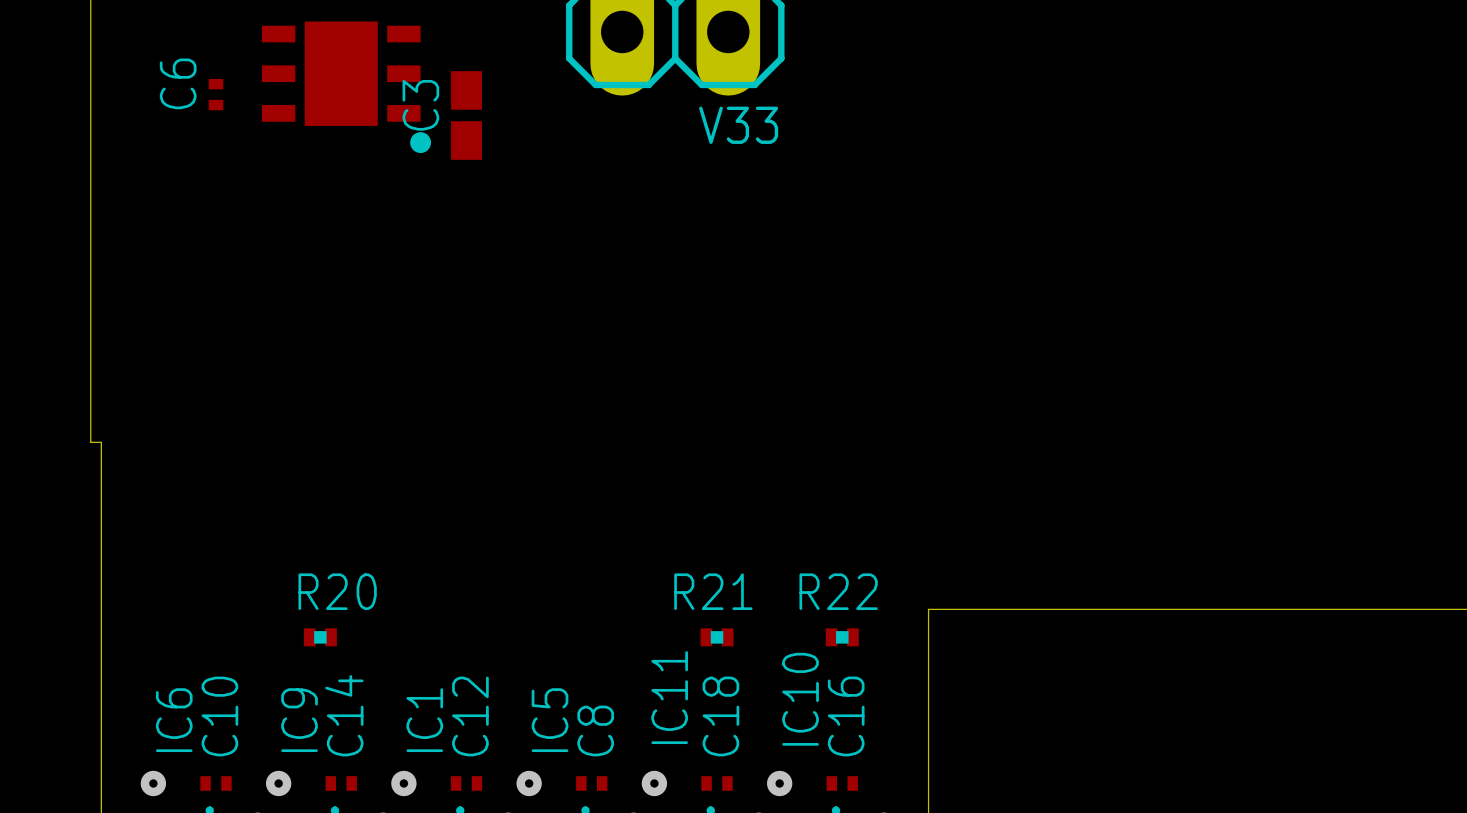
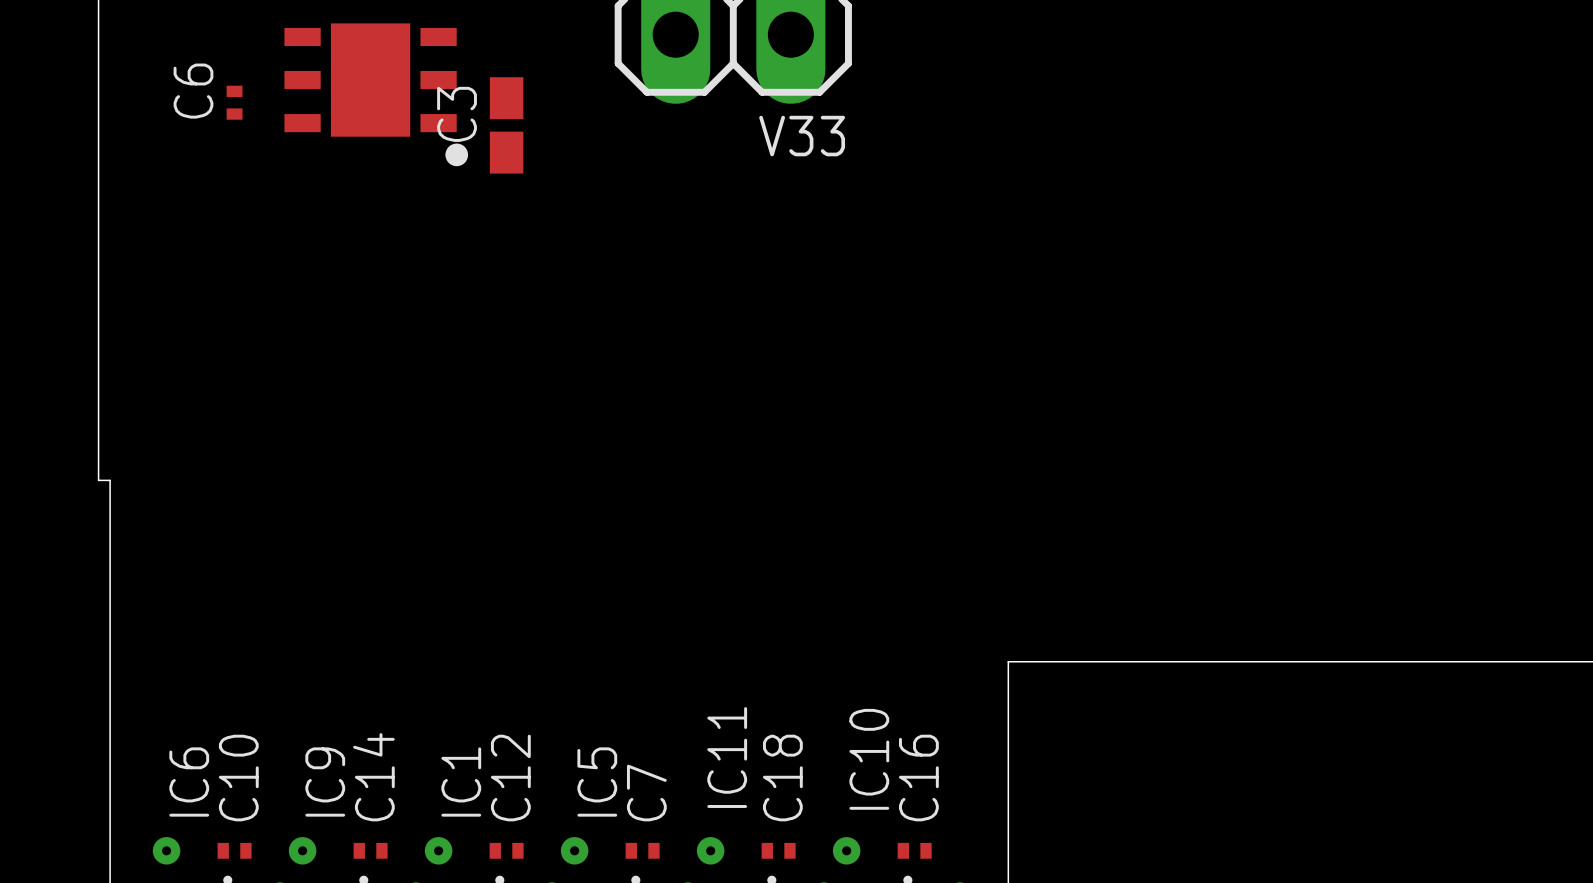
R20: (320, 637) -> none
R21: (717, 637) -> none
R22: (842, 637) -> none
C8 name: C8 (595, 731) -> C7 (646, 793)

